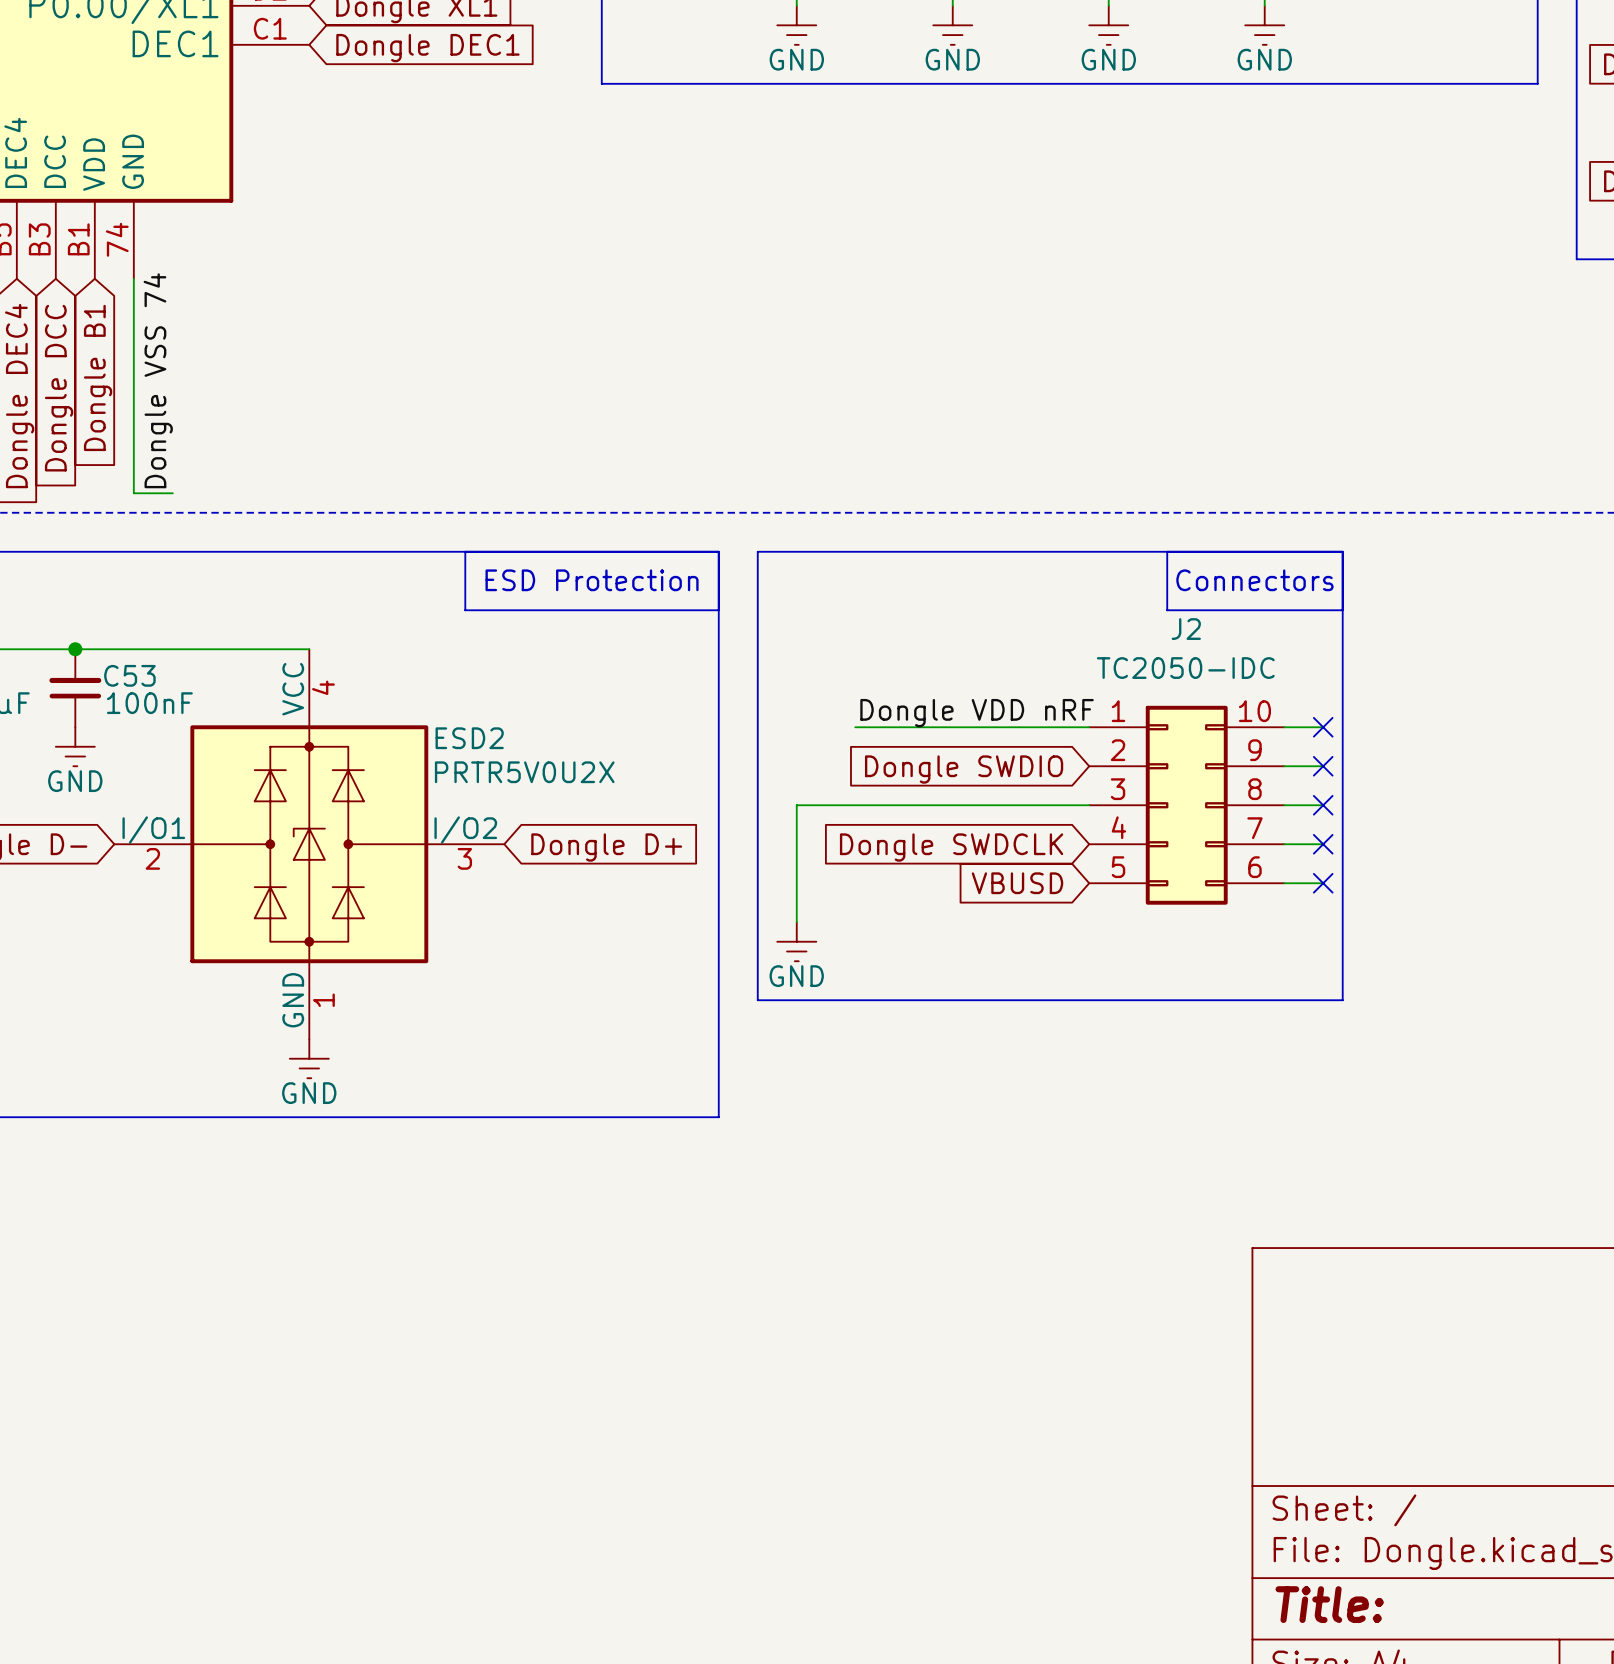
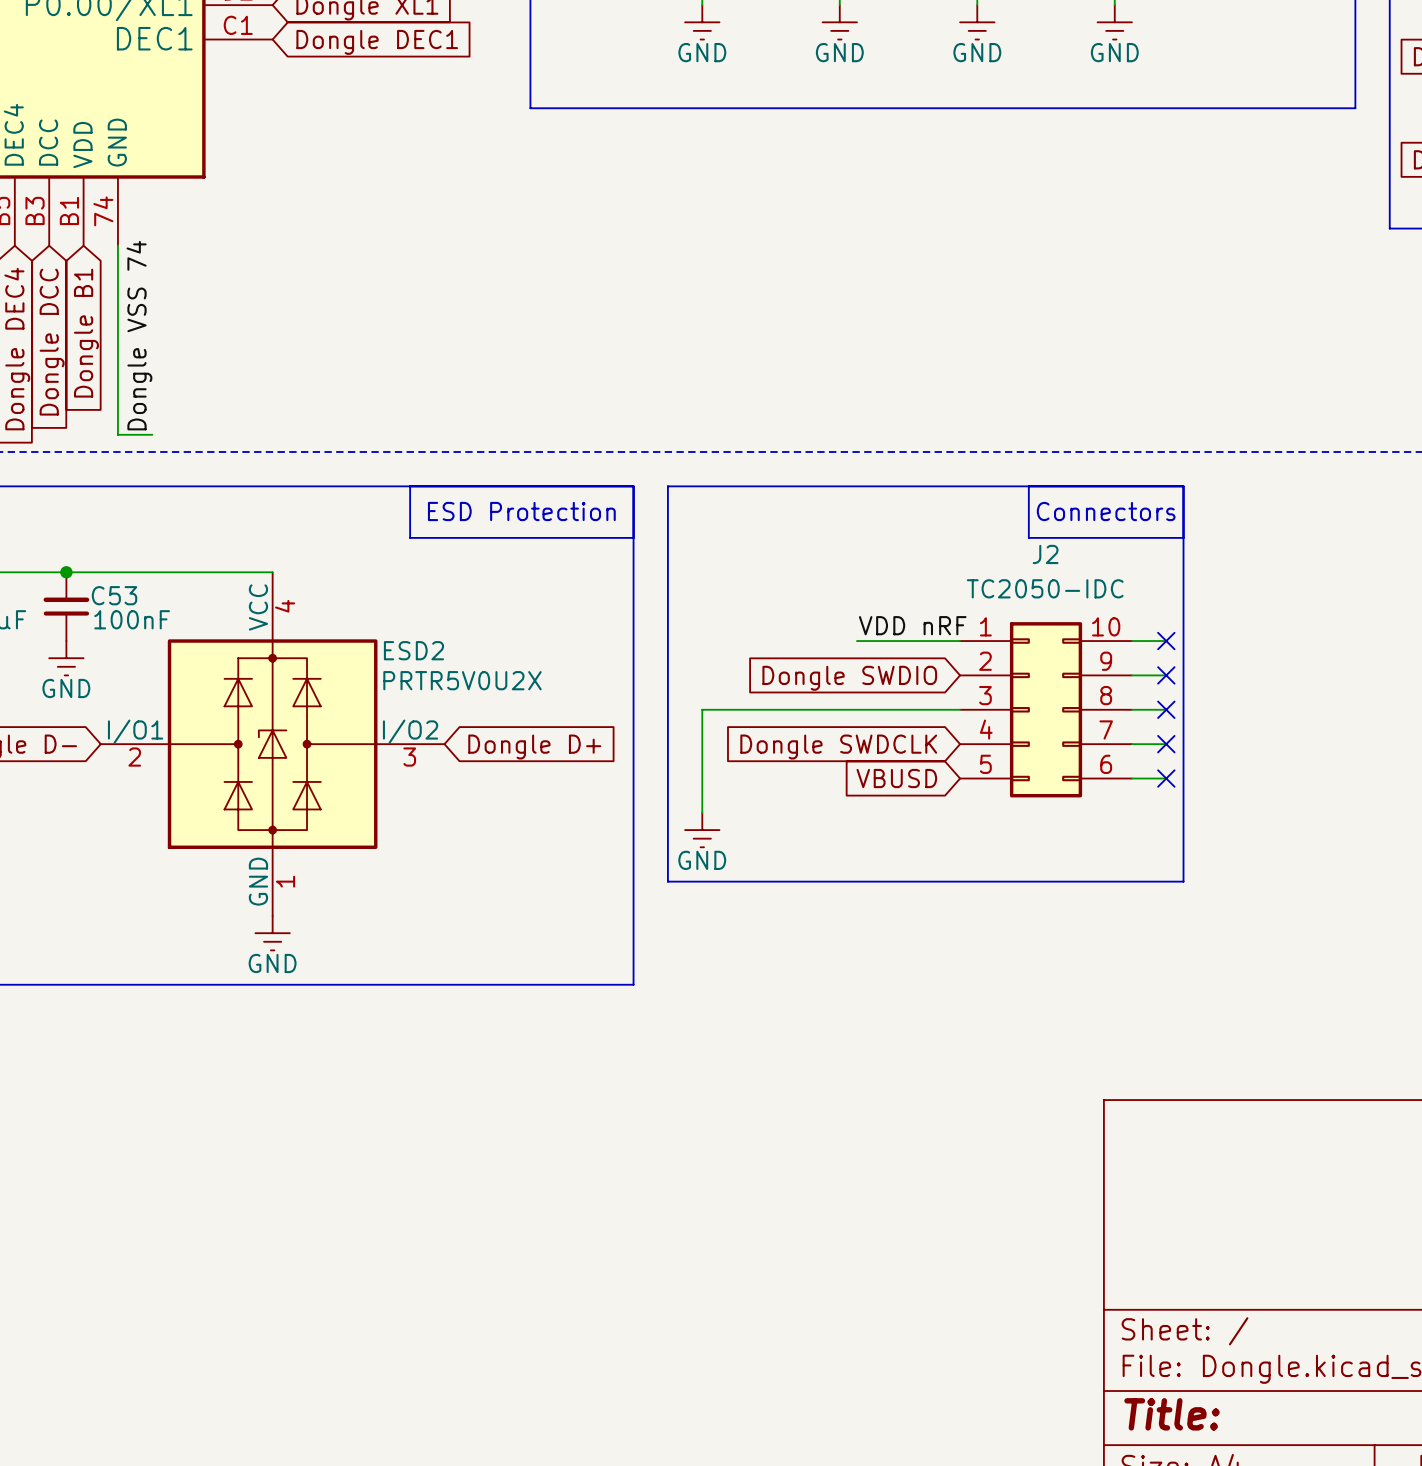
line: (601, 83) (1537, 83) -> (530, 73) (530, 108) (1355, 108) (1355, 73)
label: Dongle VDD nRF (977, 713) -> VDD nRF (912, 625)
wire: (855, 727) (972, 727) -> none

